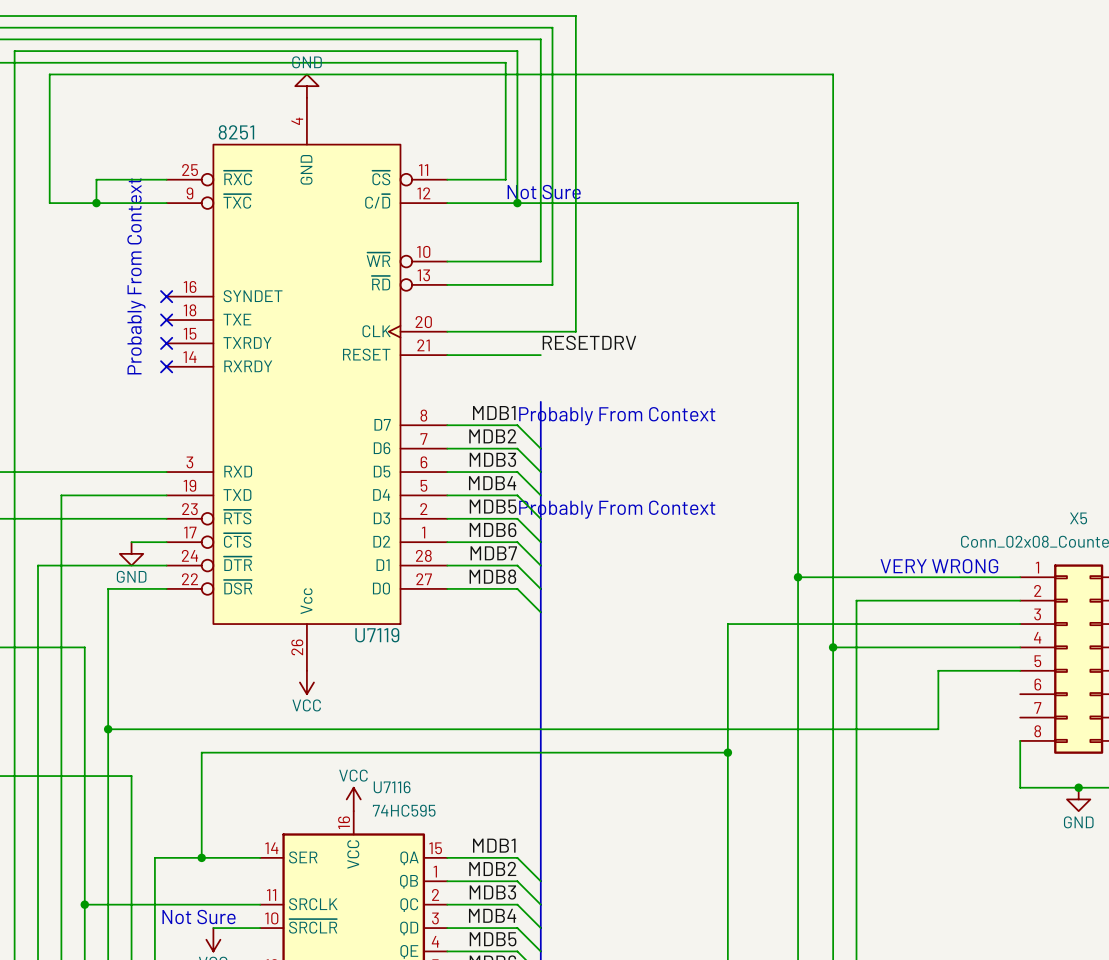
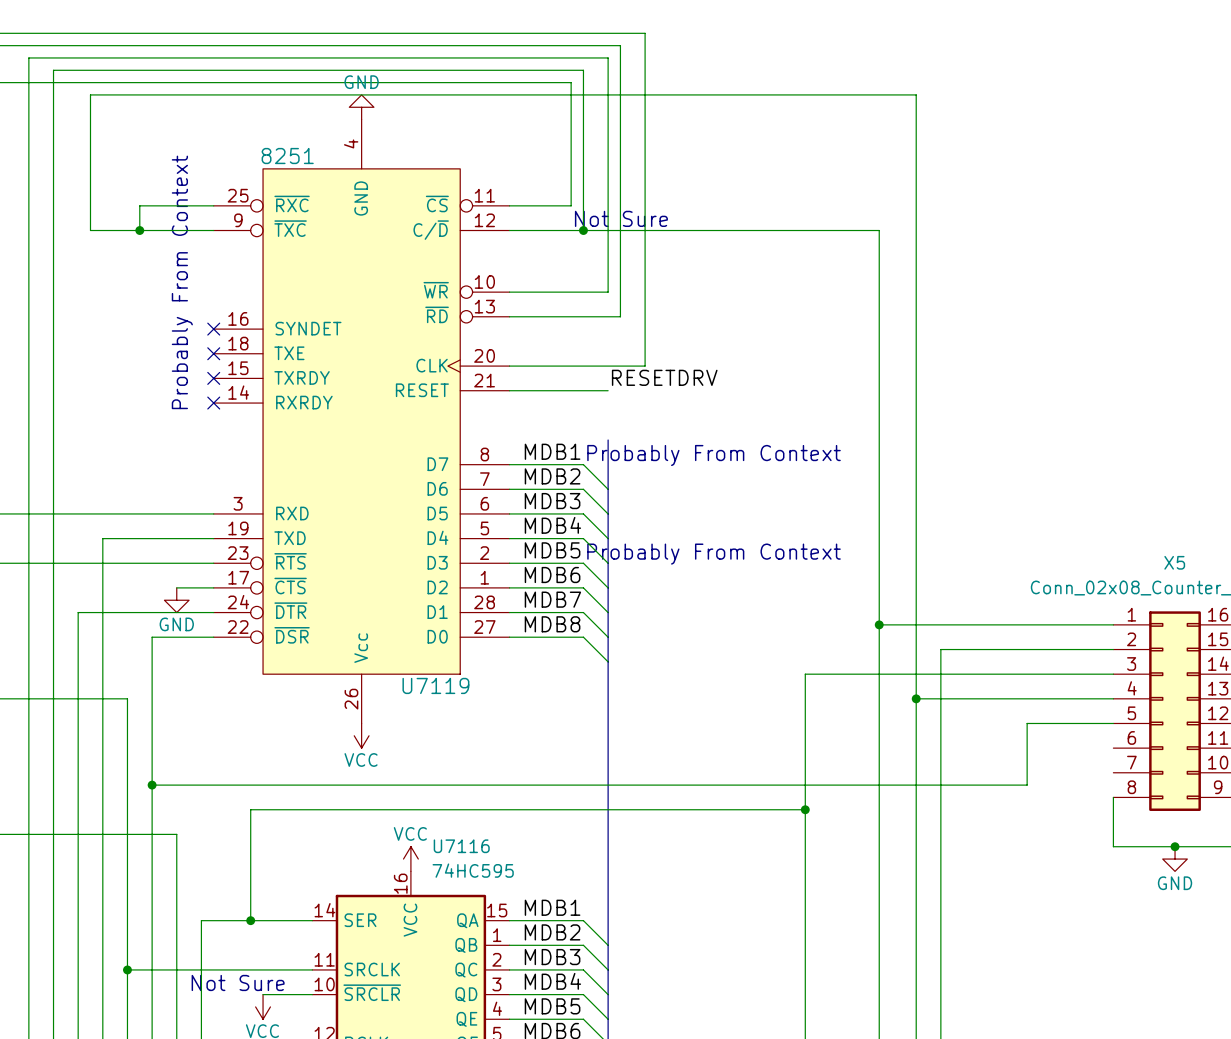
text: VERY WRONG (939, 566) -> none

